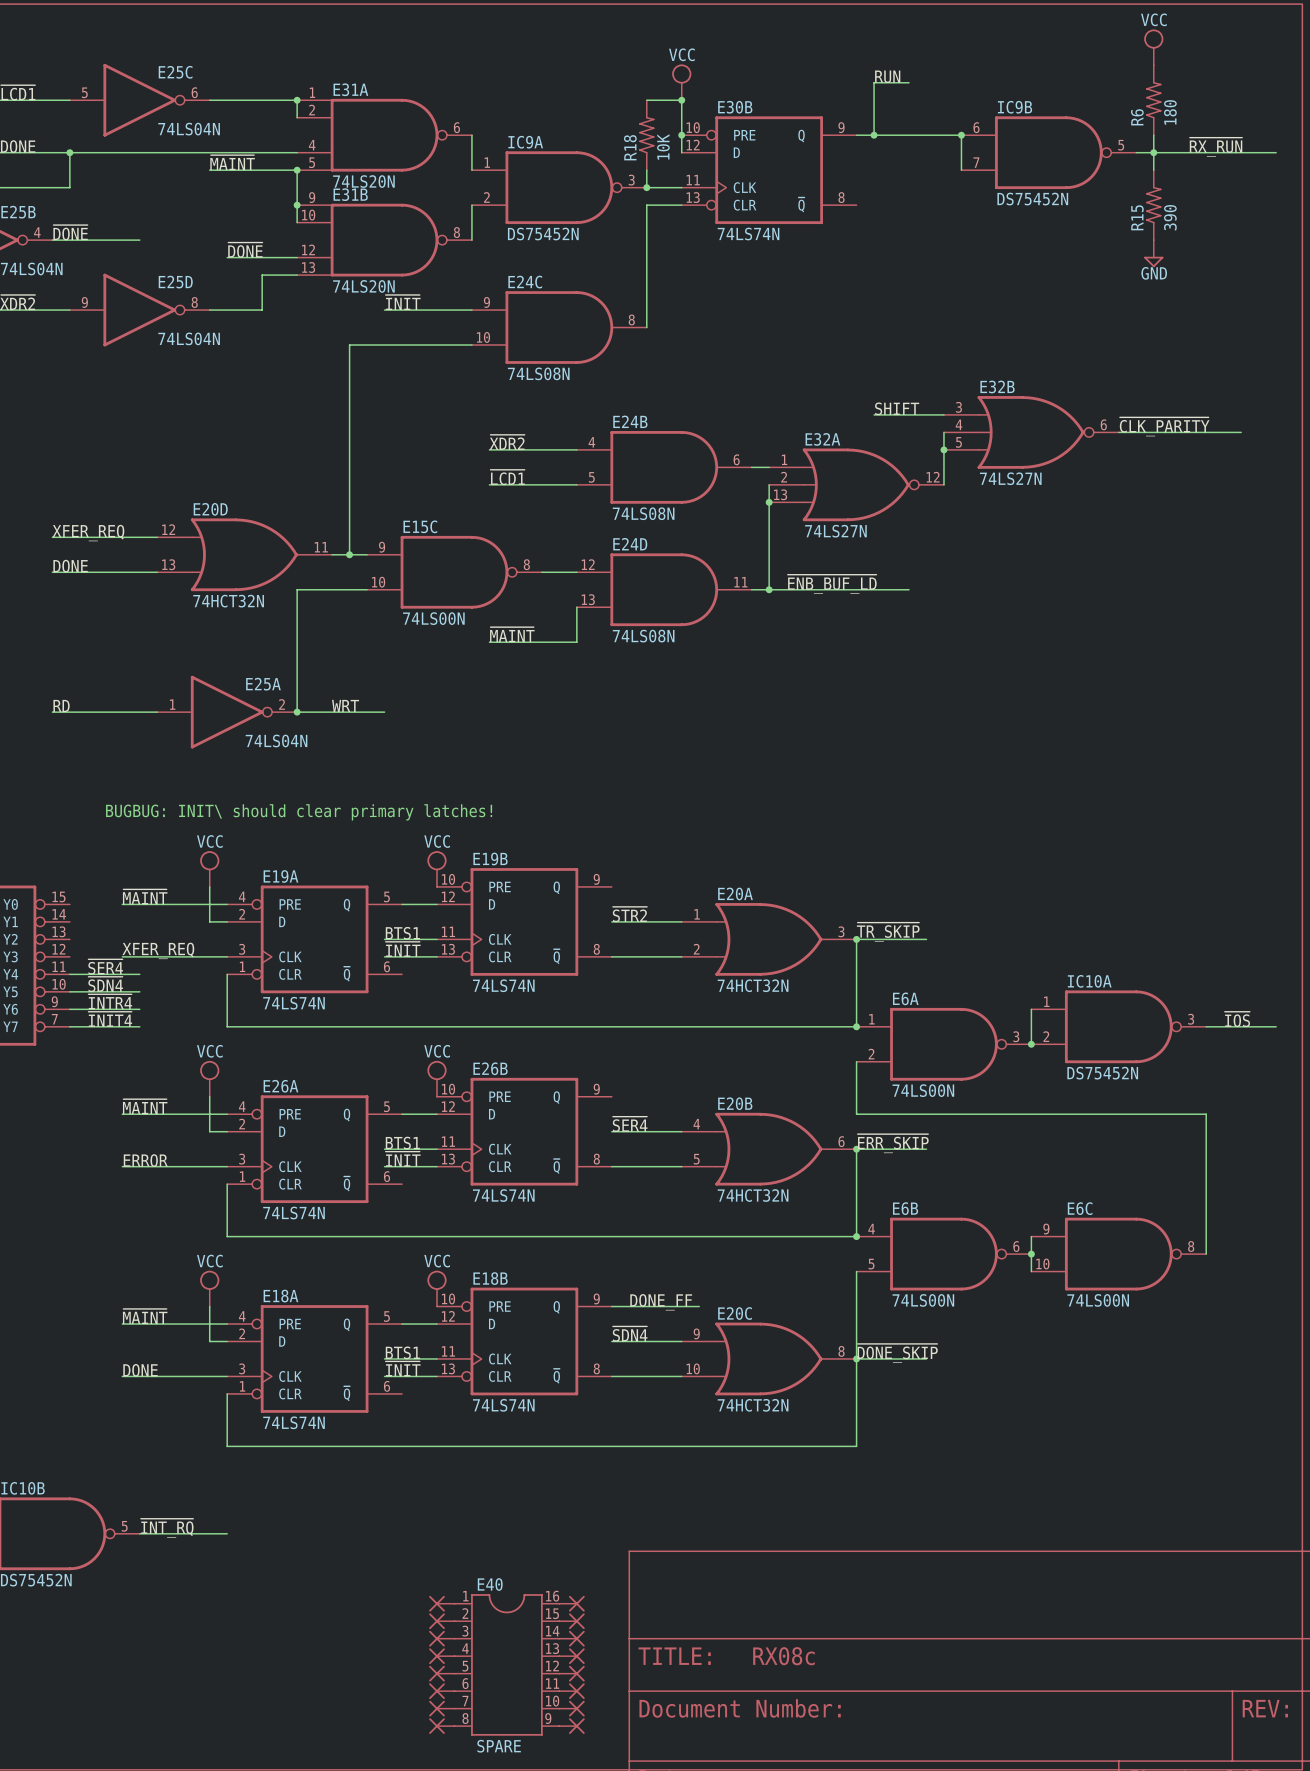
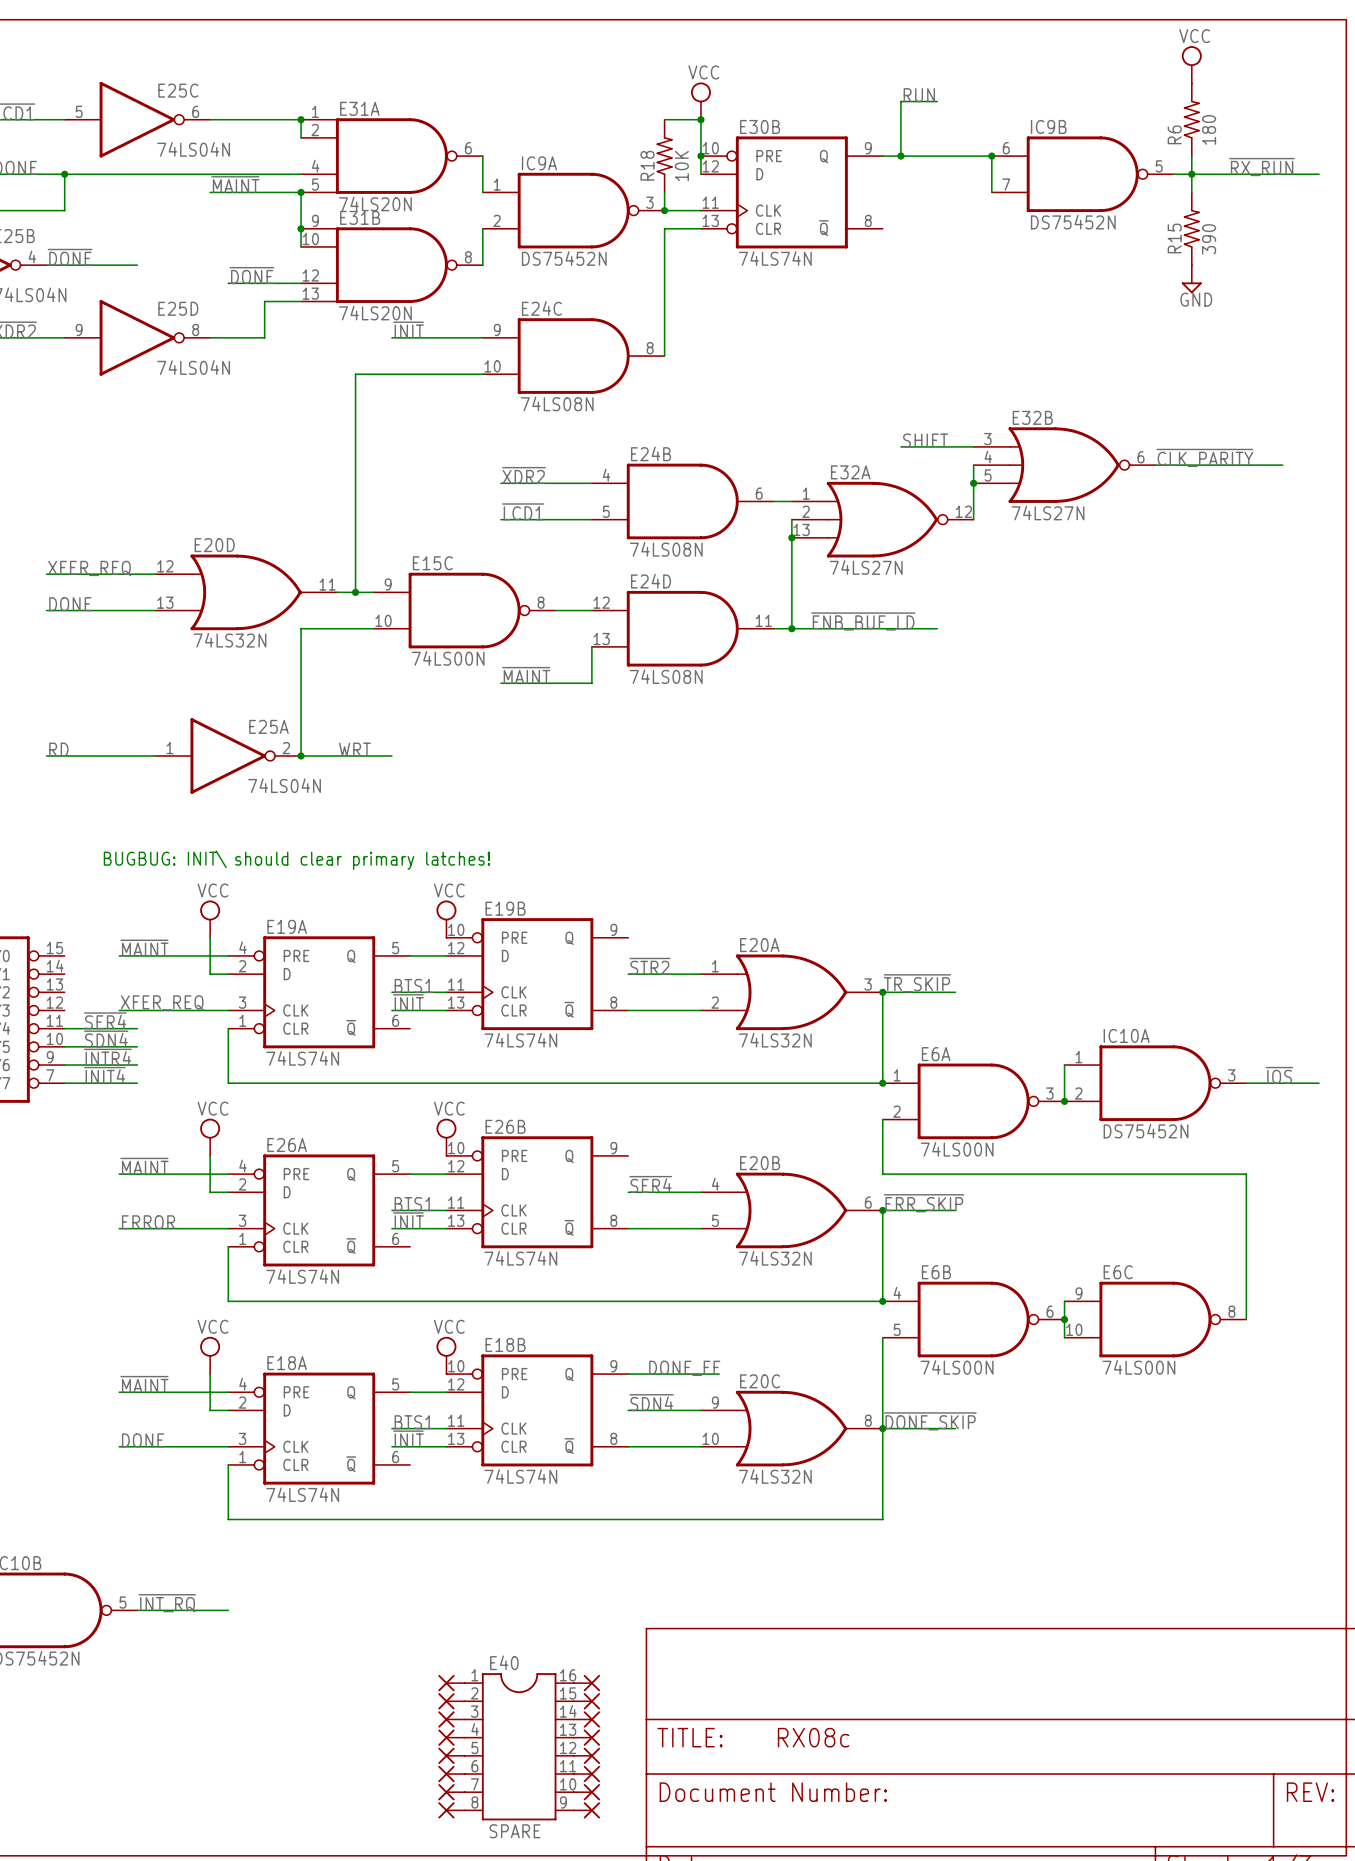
E20D value: 74HCT32N (228, 601) -> 74LS32N (229, 640)
E20A value: 74HCT32N (753, 985) -> 74LS32N (775, 1040)
E20B value: 74HCT32N (753, 1195) -> 74LS32N (775, 1258)
E20C value: 74HCT32N (753, 1405) -> 74LS32N (775, 1476)

